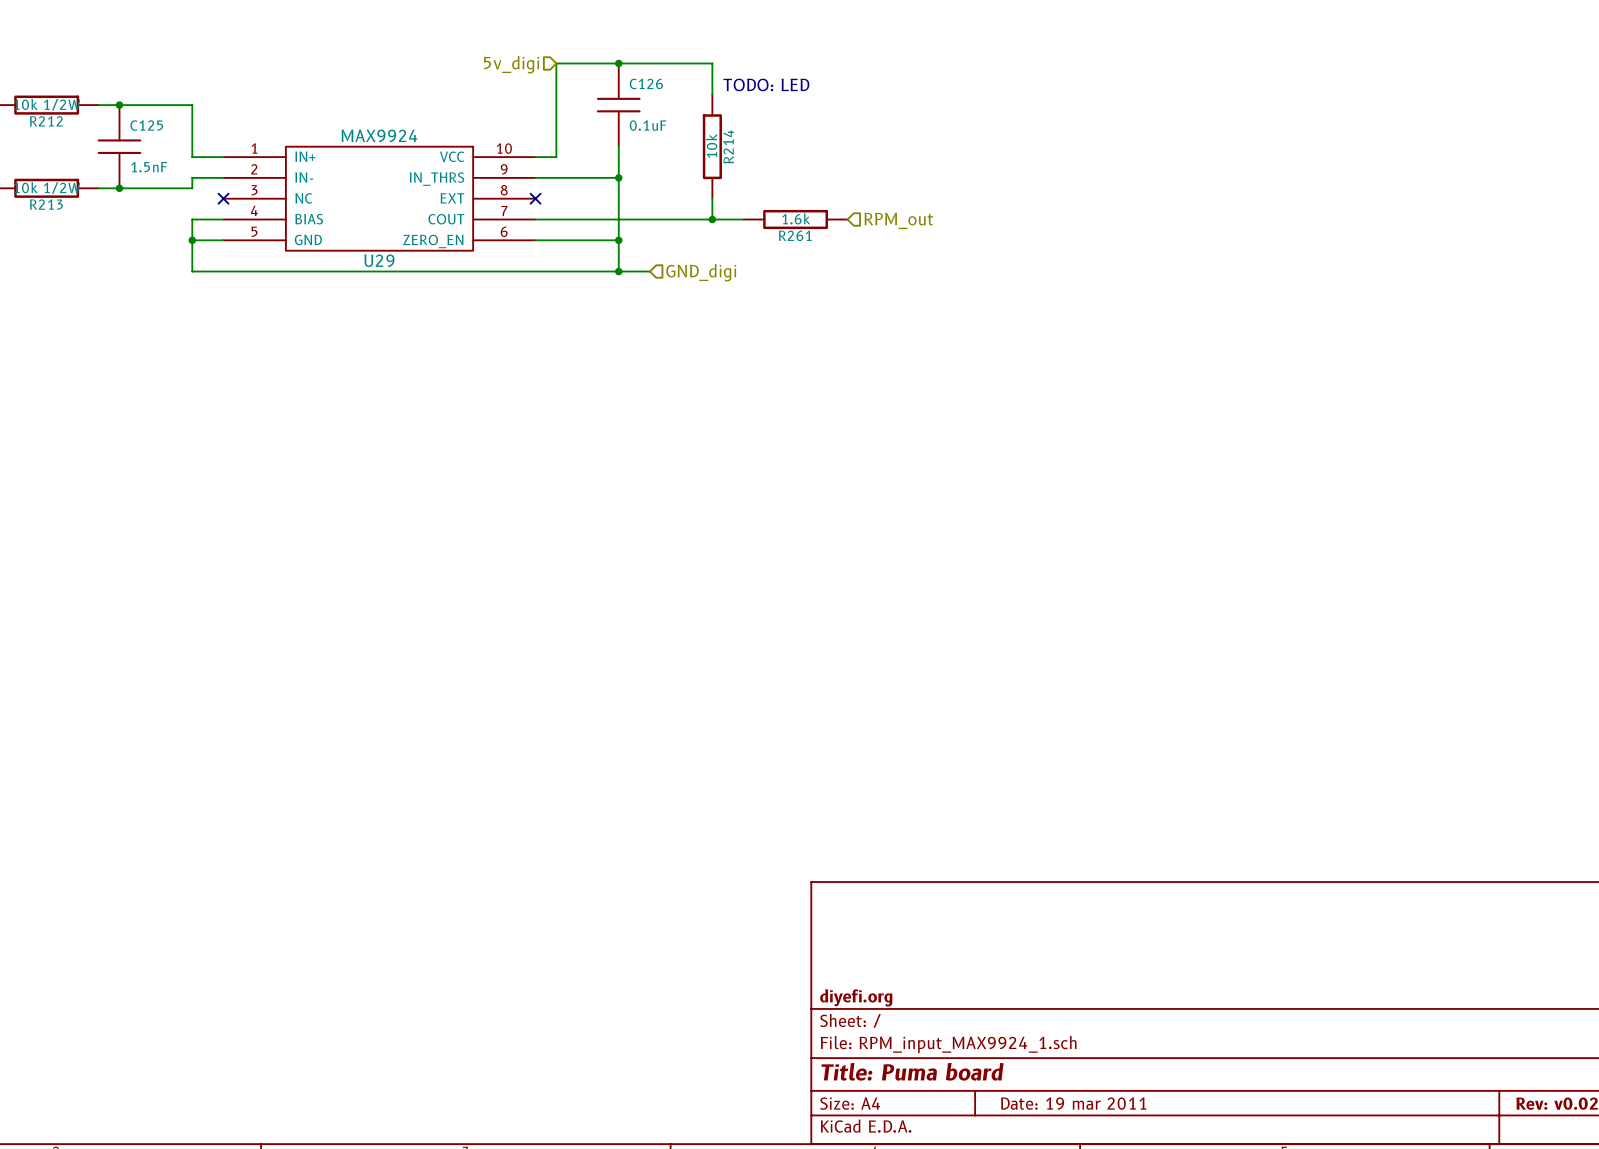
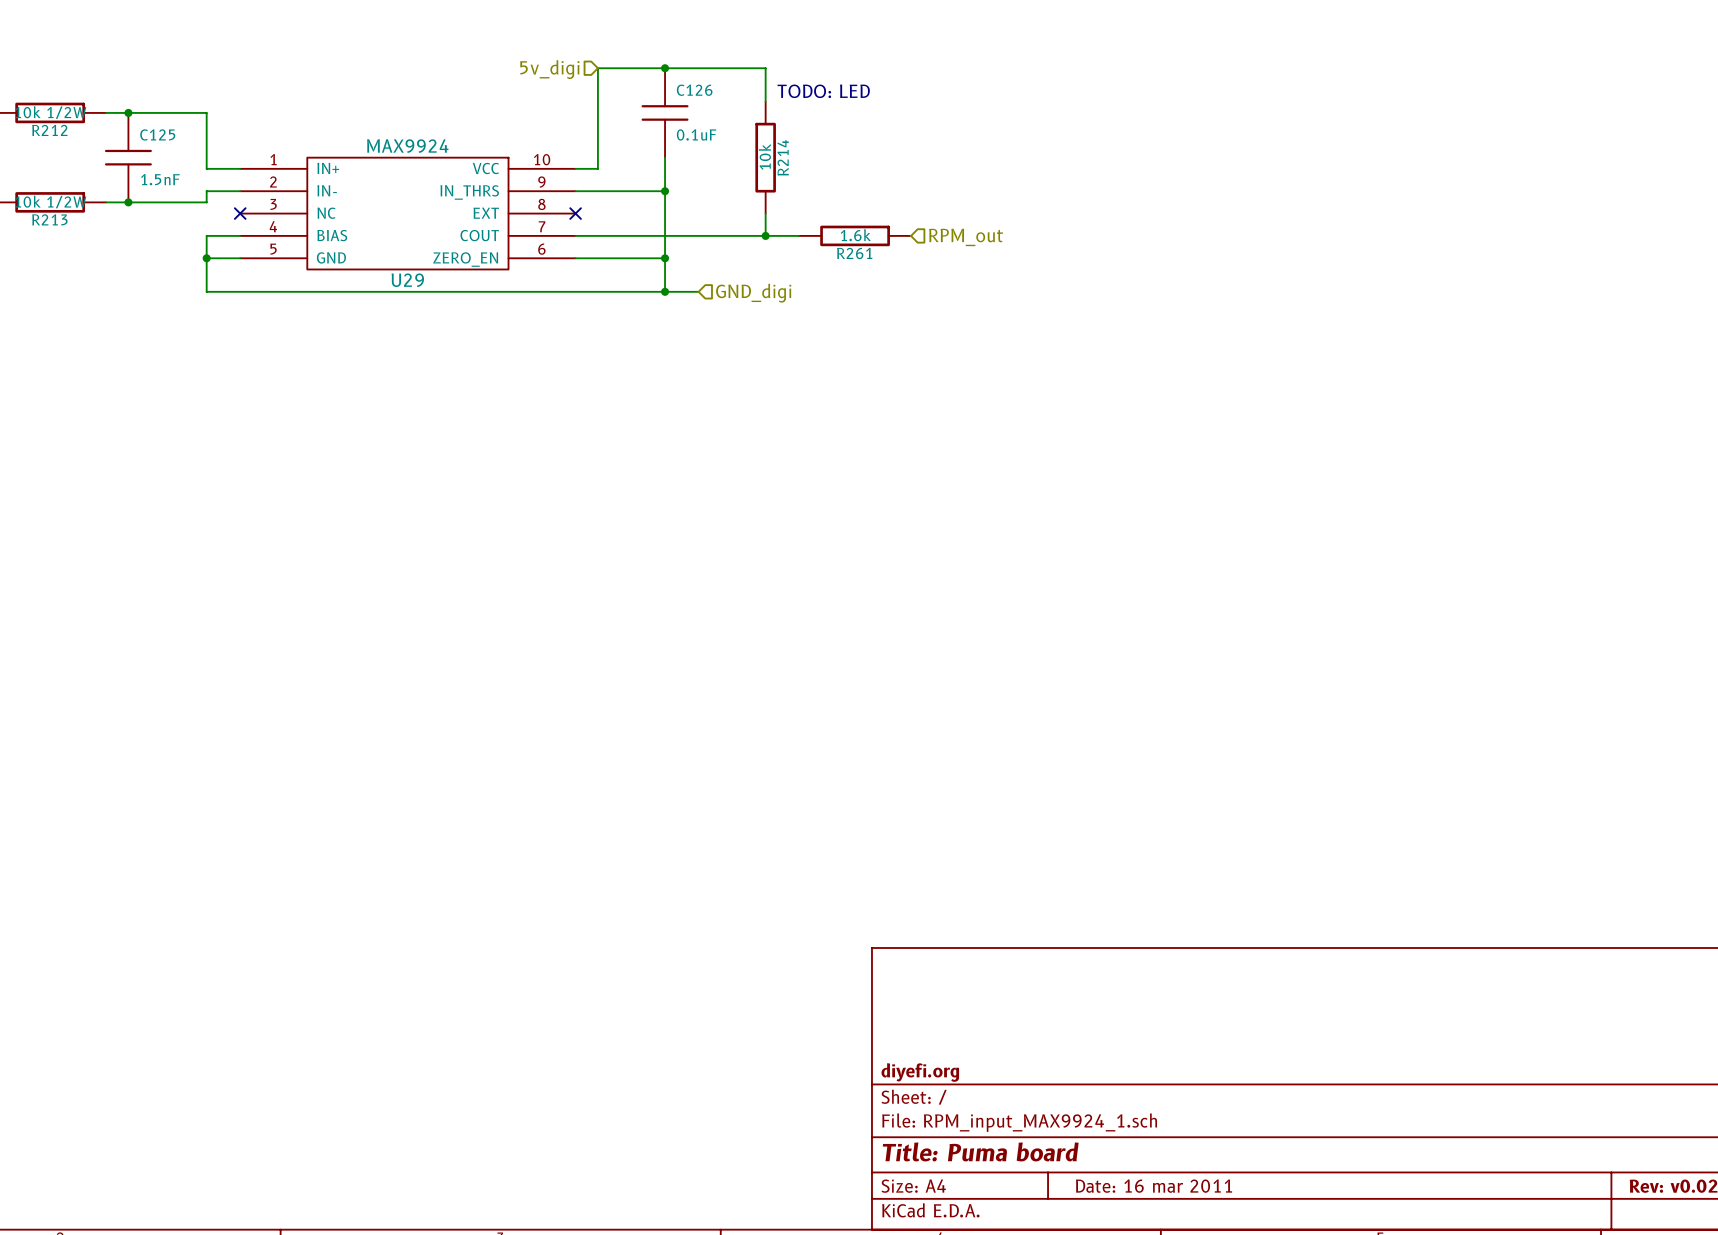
title block: Date: 19 mar 2011 (1073, 1103) -> Date: 16 mar 2011 (1154, 1186)

